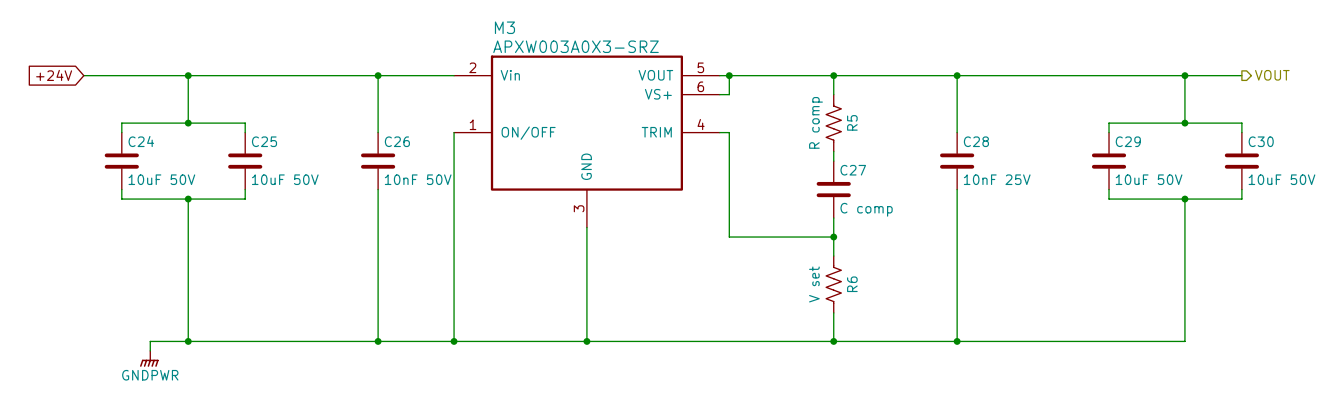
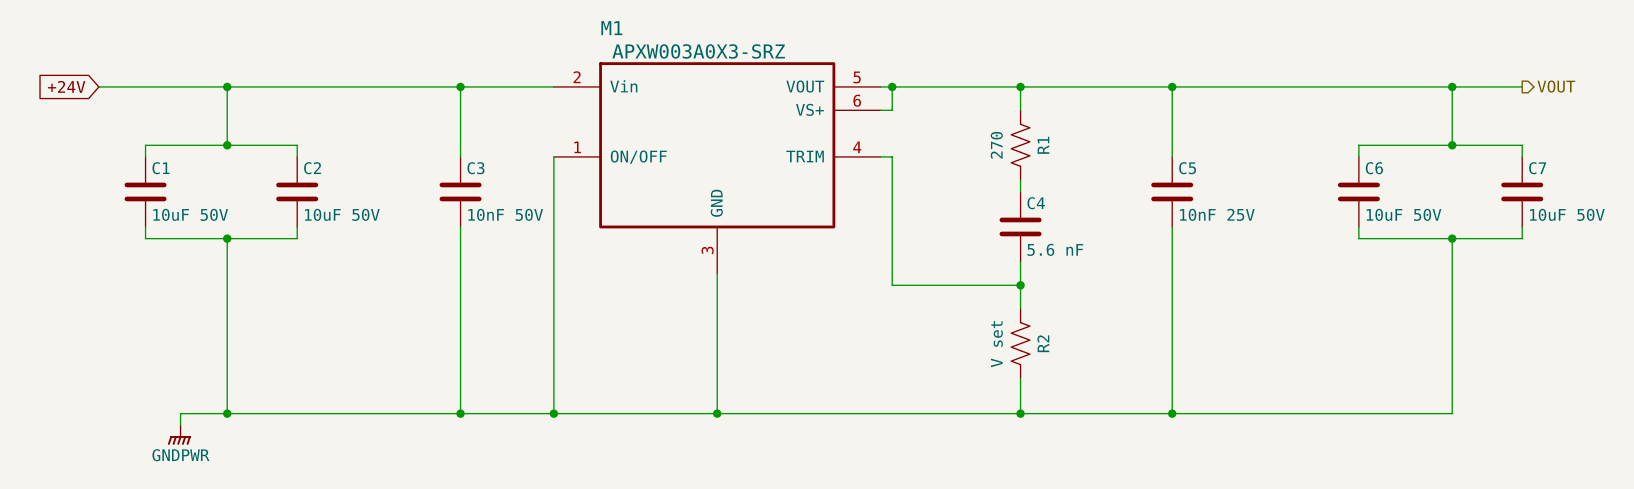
M3 name: M3 (504, 27) -> M1 (611, 28)
R5 value: R comp (815, 122) -> 270 (996, 145)
R5 name: R5 (852, 122) -> R1 (1043, 145)
C24 name: C24 (141, 141) -> C1 (161, 168)
C25 name: C25 (264, 141) -> C2 (312, 168)
C26 name: C26 (397, 141) -> C3 (475, 168)
C28 name: C28 (976, 141) -> C5 (1187, 168)
C29 name: C29 (1128, 141) -> C6 (1374, 168)
C30 name: C30 (1261, 141) -> C7 (1537, 168)
C27 name: C27 (853, 170) -> C4 (1036, 203)
C27 value: C comp (866, 209) -> 5.6 nF (1055, 249)
R6 name: R6 (852, 284) -> R2 (1043, 343)

